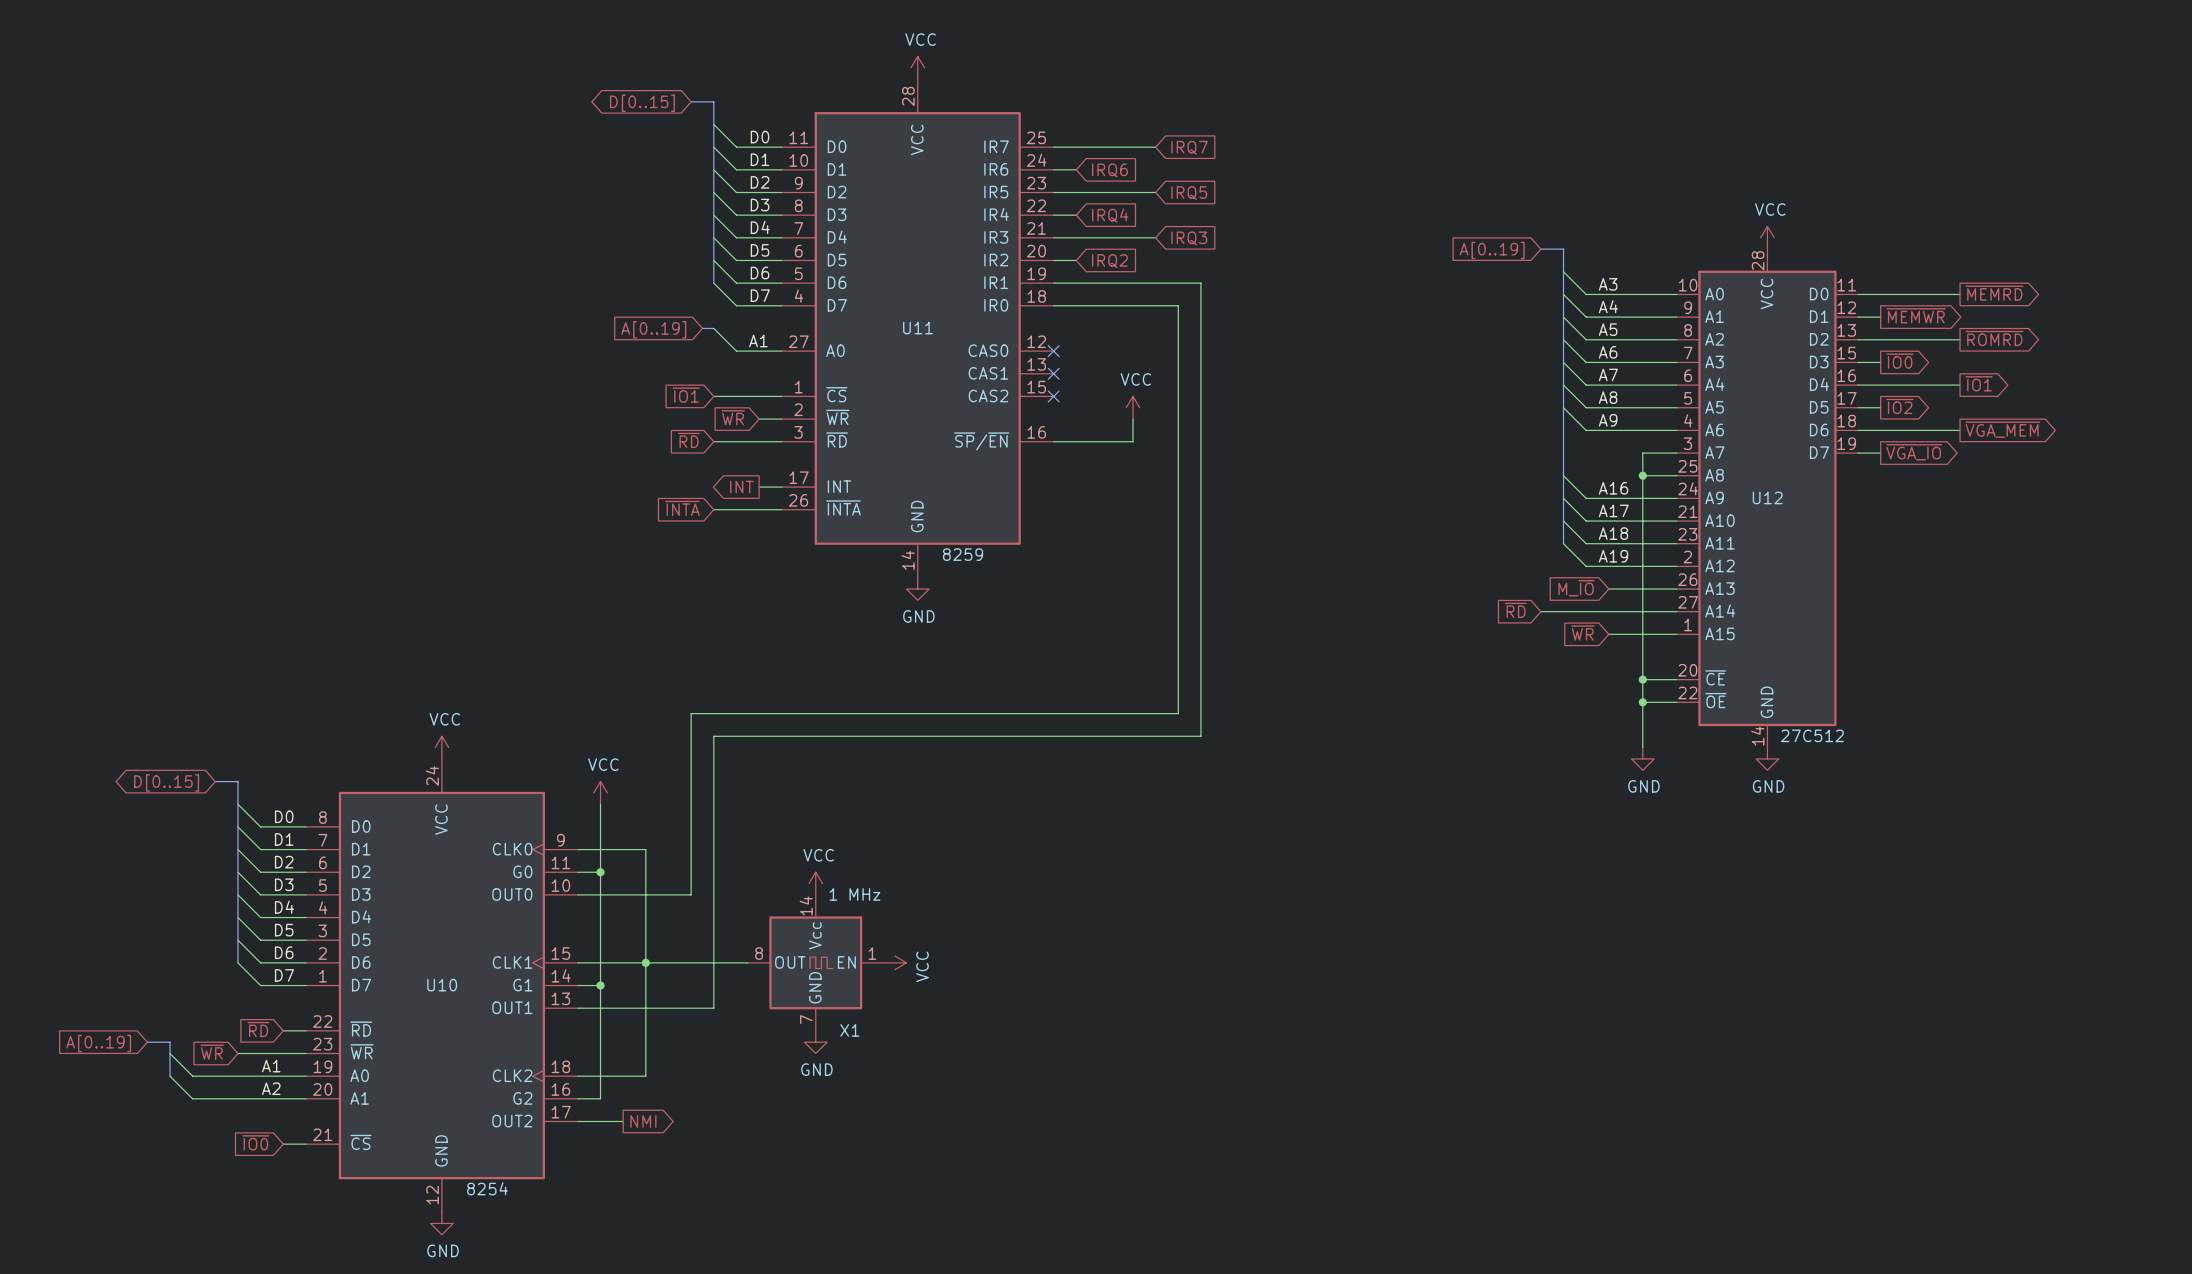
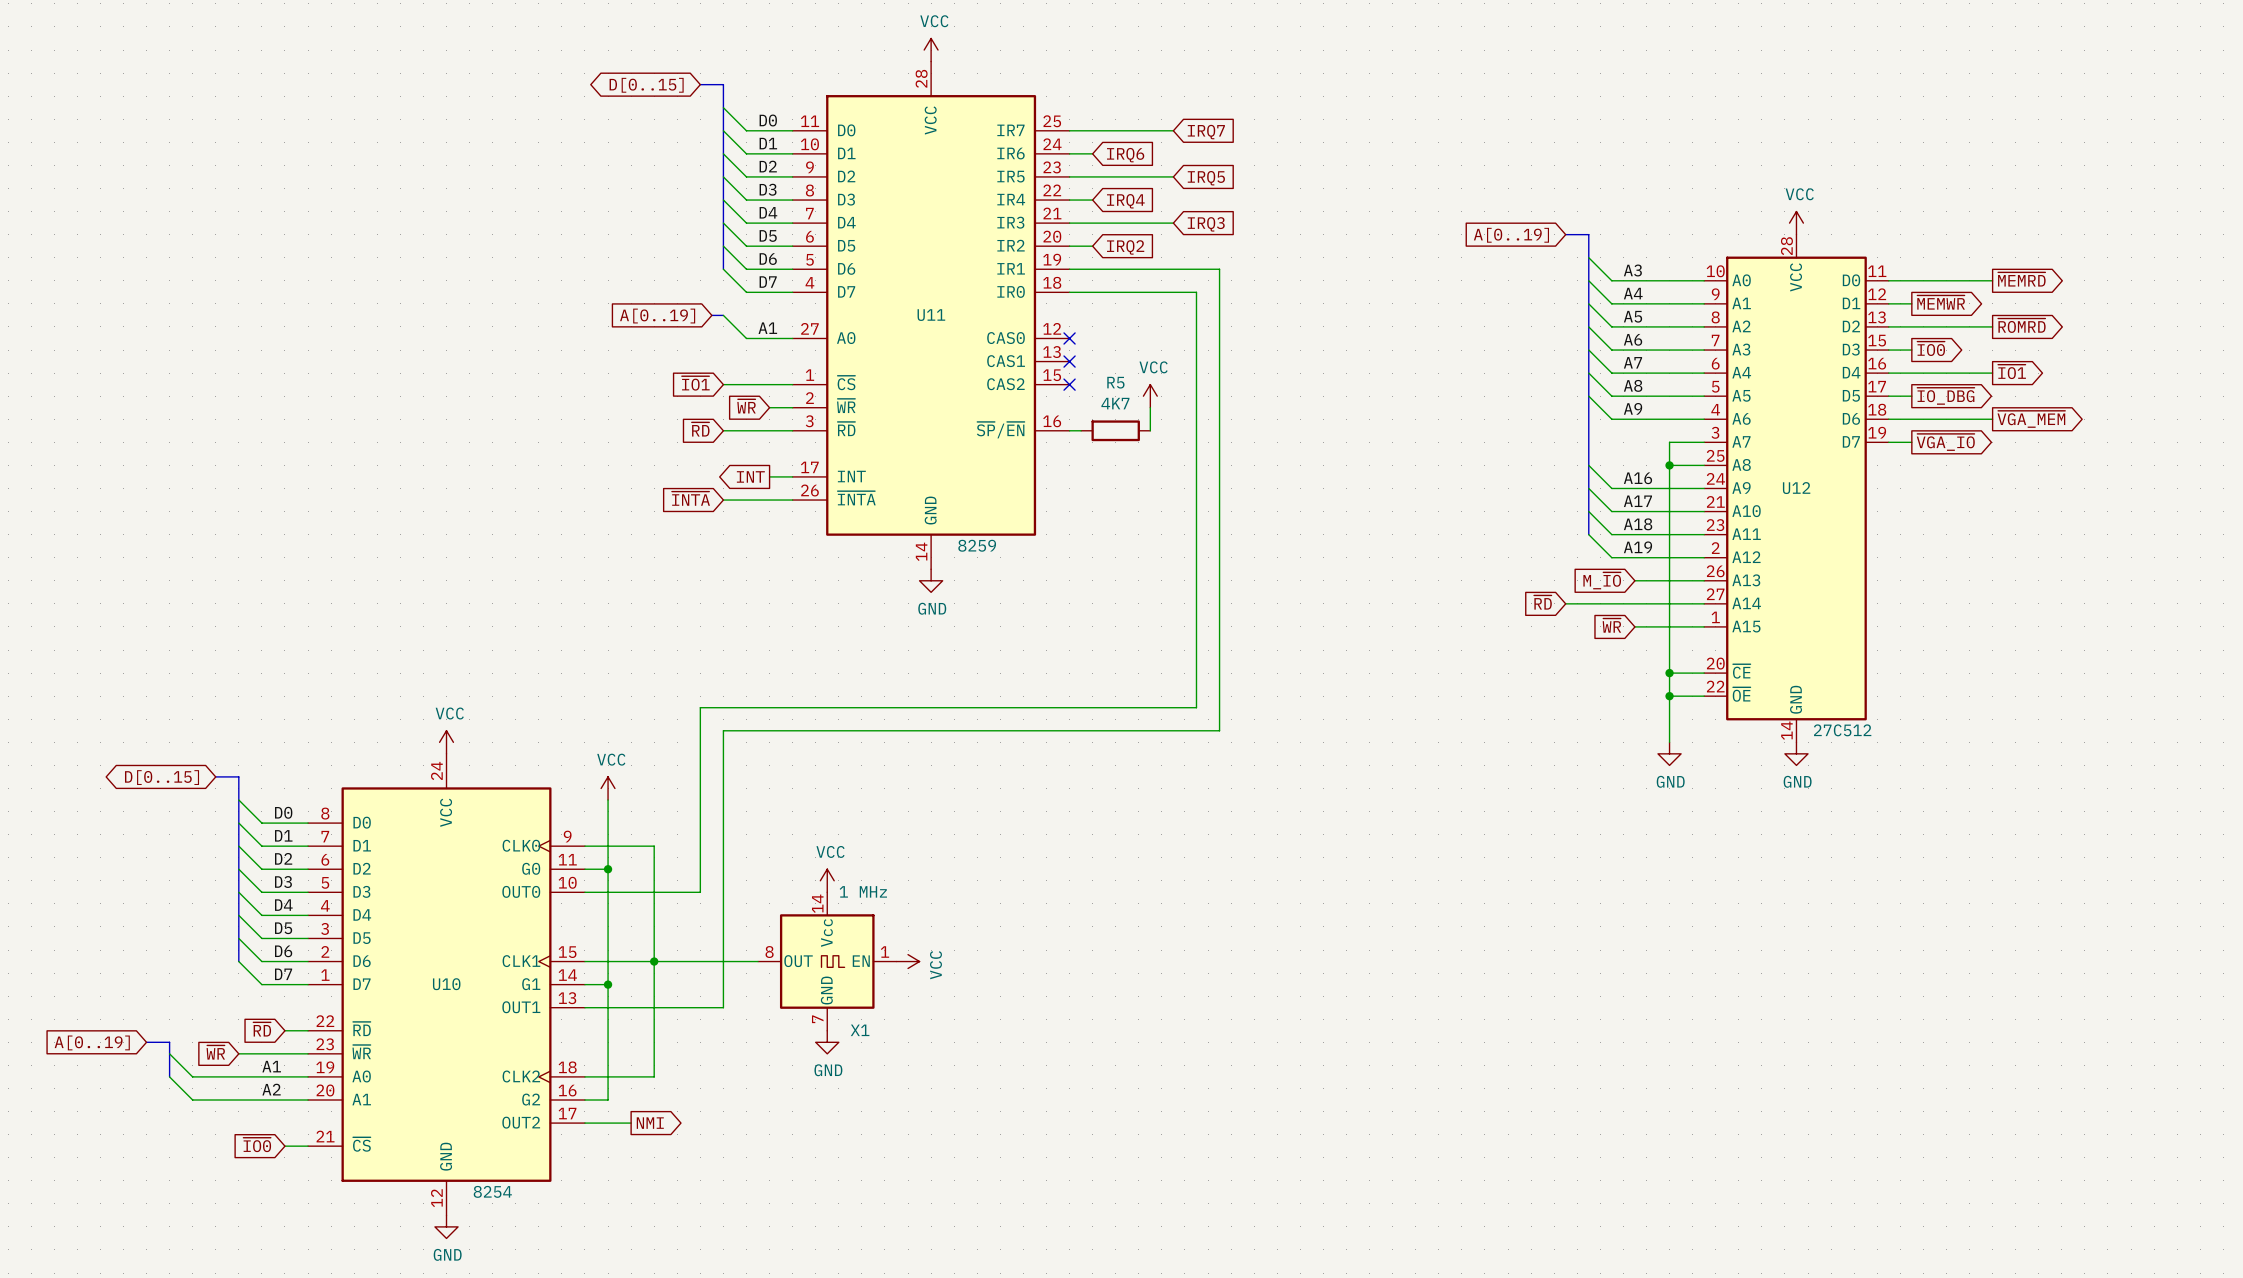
global label: ~{IO2} (1899, 406) -> ~{IO_DBG} (1945, 396)
wire: (1065, 441) (1132, 441) -> none
R5: none -> 4K7 (1115, 430)

